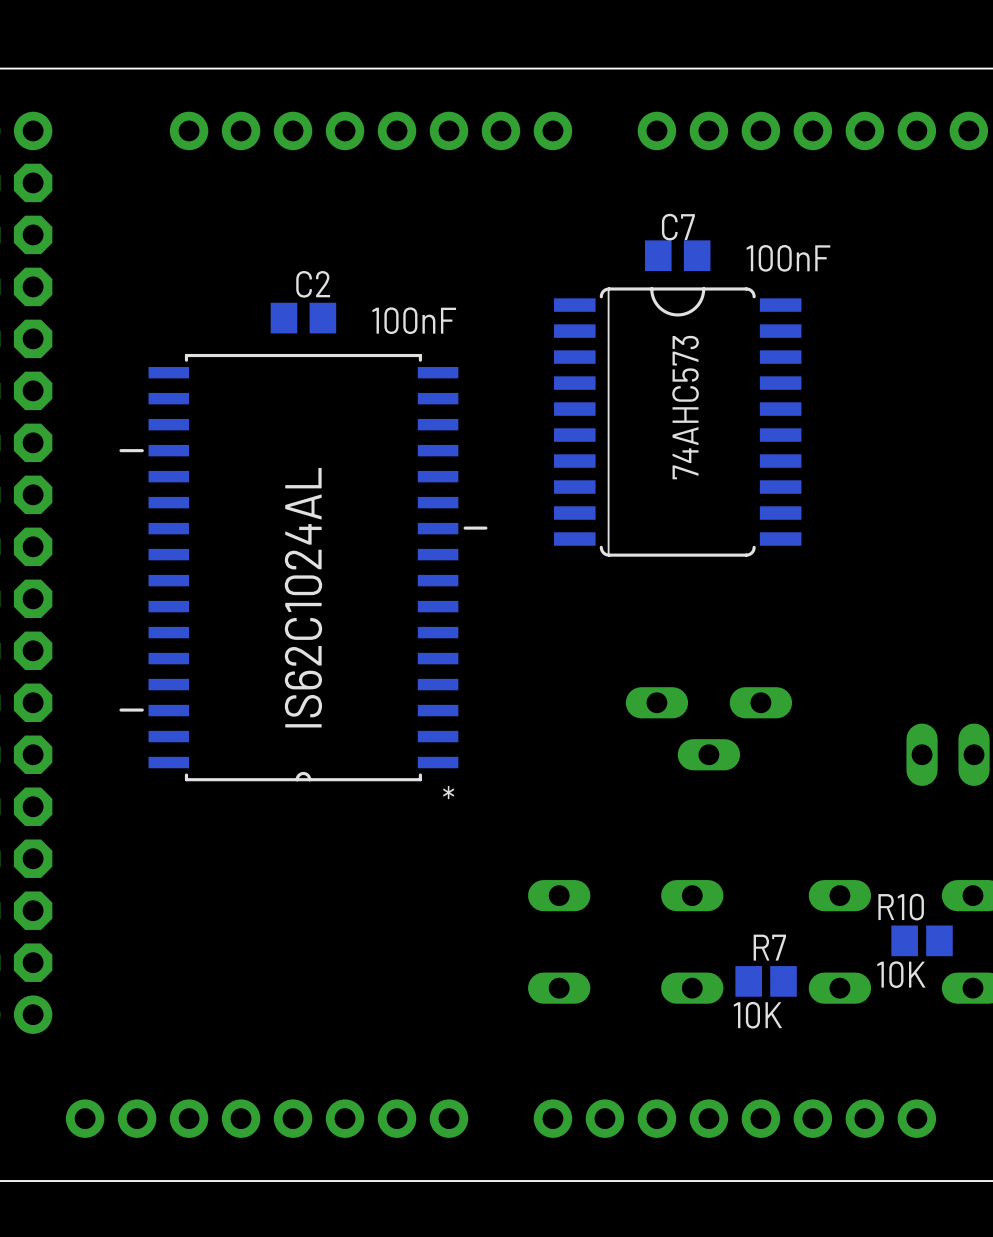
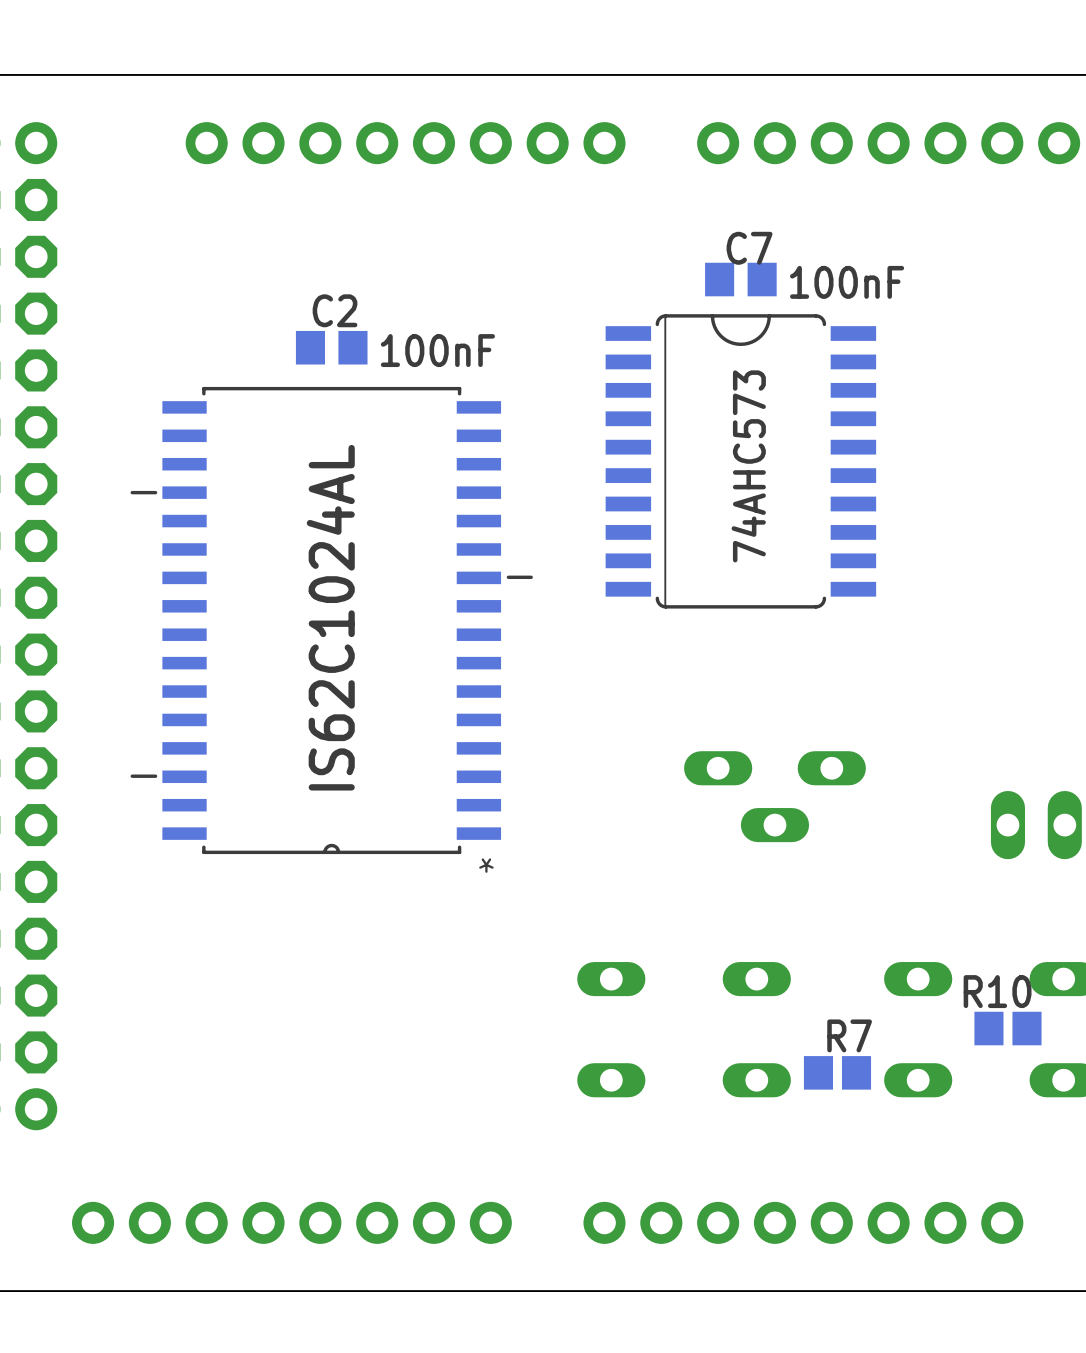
R10 value: 10K (901, 974) -> none
R7 value: 10K (757, 1015) -> none

